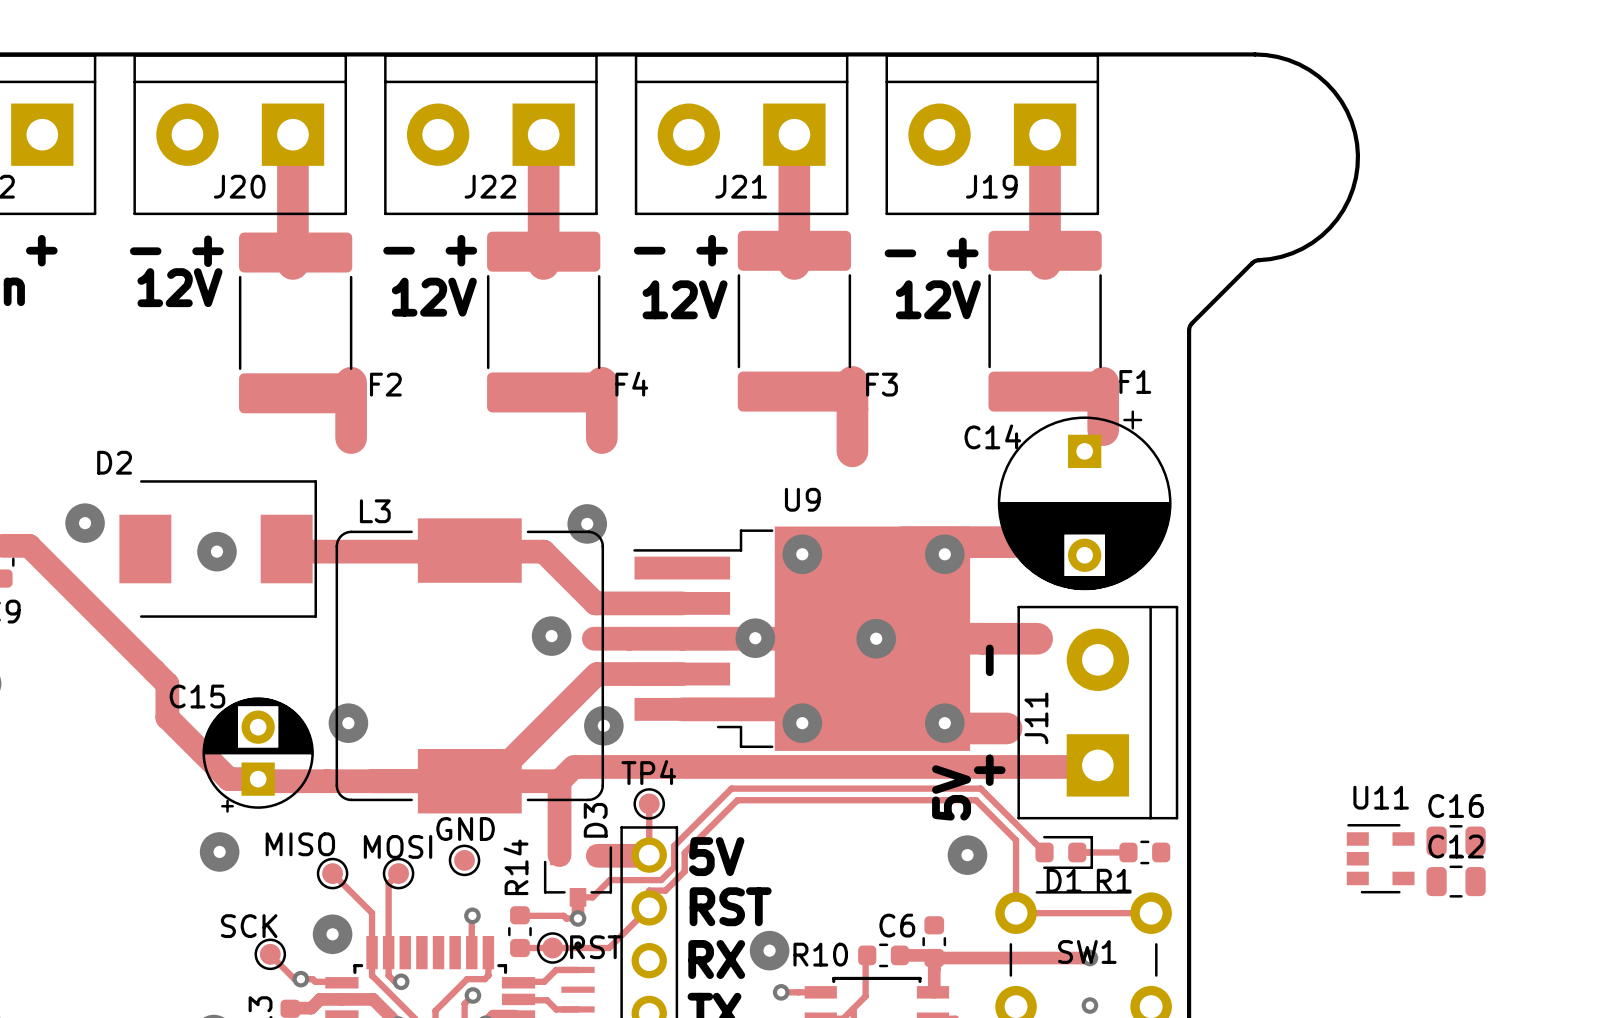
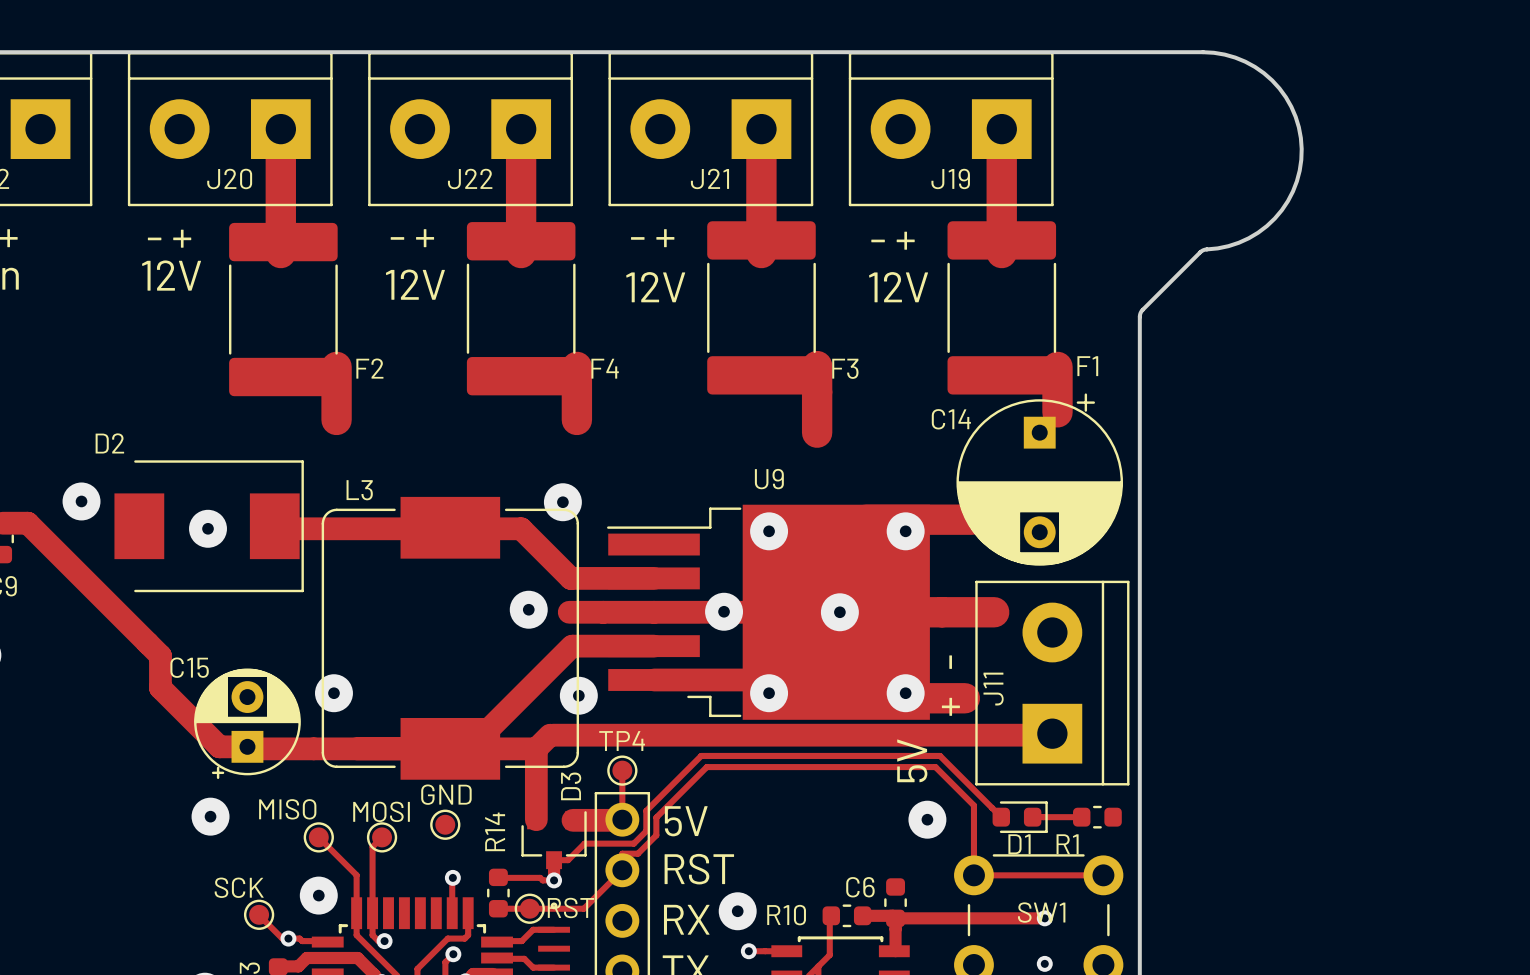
C16: (1456, 841) -> none
U11: (1380, 858) -> none
C12: (1456, 881) -> none

